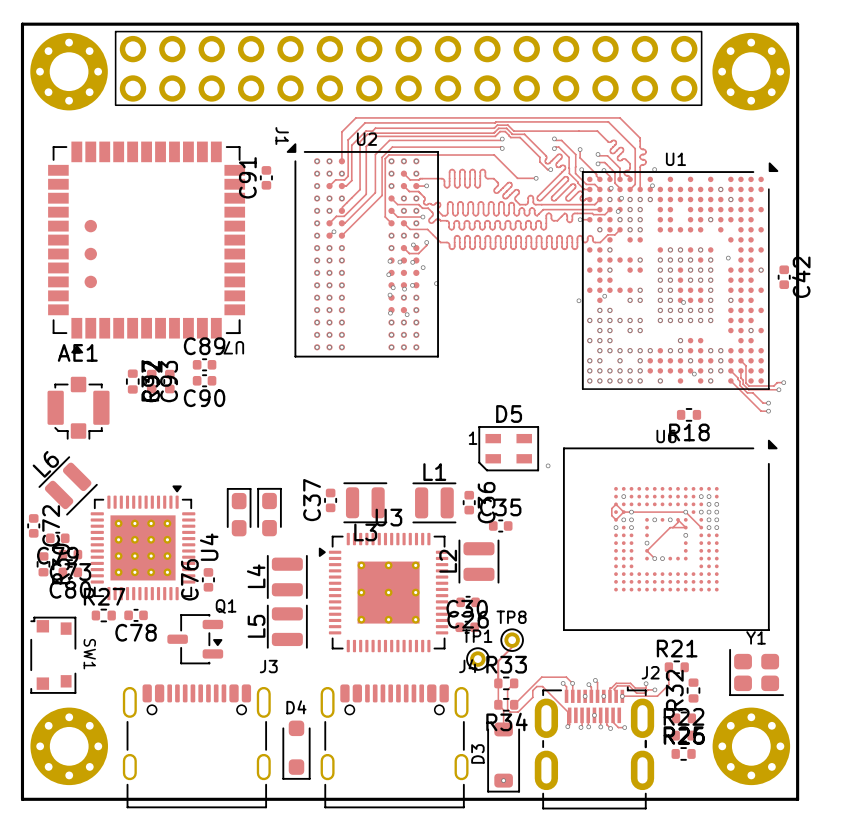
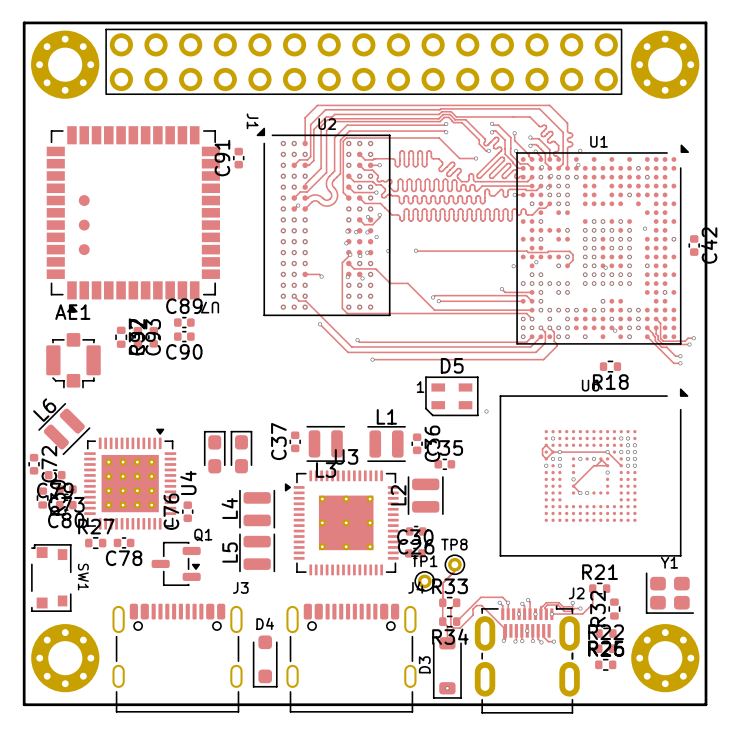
track: (369, 198) (344, 223) -> (329, 176) (326, 183) (331, 194) (330, 198) (325, 200) (315, 194) (307, 198)
track: (374, 203) (349, 228) -> (333, 180) (332, 184) (337, 195) (334, 202) (326, 206) (316, 200) (311, 202)
track: none -> (416, 250) (569, 251) (573, 254) (573, 260) (567, 265)
via: none -> (416, 250)
track: none -> (350, 254) (342, 262) (342, 308) (347, 313) (526, 313) (532, 319)
via: (390, 295) -> none
track: none -> (348, 263) (354, 268) (375, 268) (390, 283) (407, 283) (434, 310) (532, 310)
via: (640, 300) -> none
track: none -> (305, 274) (319, 274) (321, 276)
via: (341, 310) -> none
via: none -> (321, 276)
track: none -> (501, 289) (505, 292) (532, 292)
via: none -> (501, 289)
via: (599, 330) -> none
track: none -> (294, 296) (299, 301) (305, 301) (351, 346) (530, 346) (540, 336)
track: none -> (433, 297) (434, 295) (526, 295) (532, 301)
via: none -> (433, 297)
via: none -> (438, 301)
track: none -> (438, 301) (523, 301)
via: (589, 340) -> none
via: (599, 340) -> none
via: (599, 350) -> none
track: none -> (320, 324) (348, 352) (535, 352) (544, 343)
via: none -> (320, 324)
track: none -> (540, 327) (545, 332) (544, 343)
track: none -> (549, 327) (554, 332) (554, 341) (557, 346) (543, 359) (372, 359)
track: none -> (532, 336) (526, 342) (359, 342) (357, 340)
via: (599, 380) -> none
via: (609, 380) -> none
via: (620, 380) -> none
via: none -> (357, 340)
via: none -> (372, 359)

